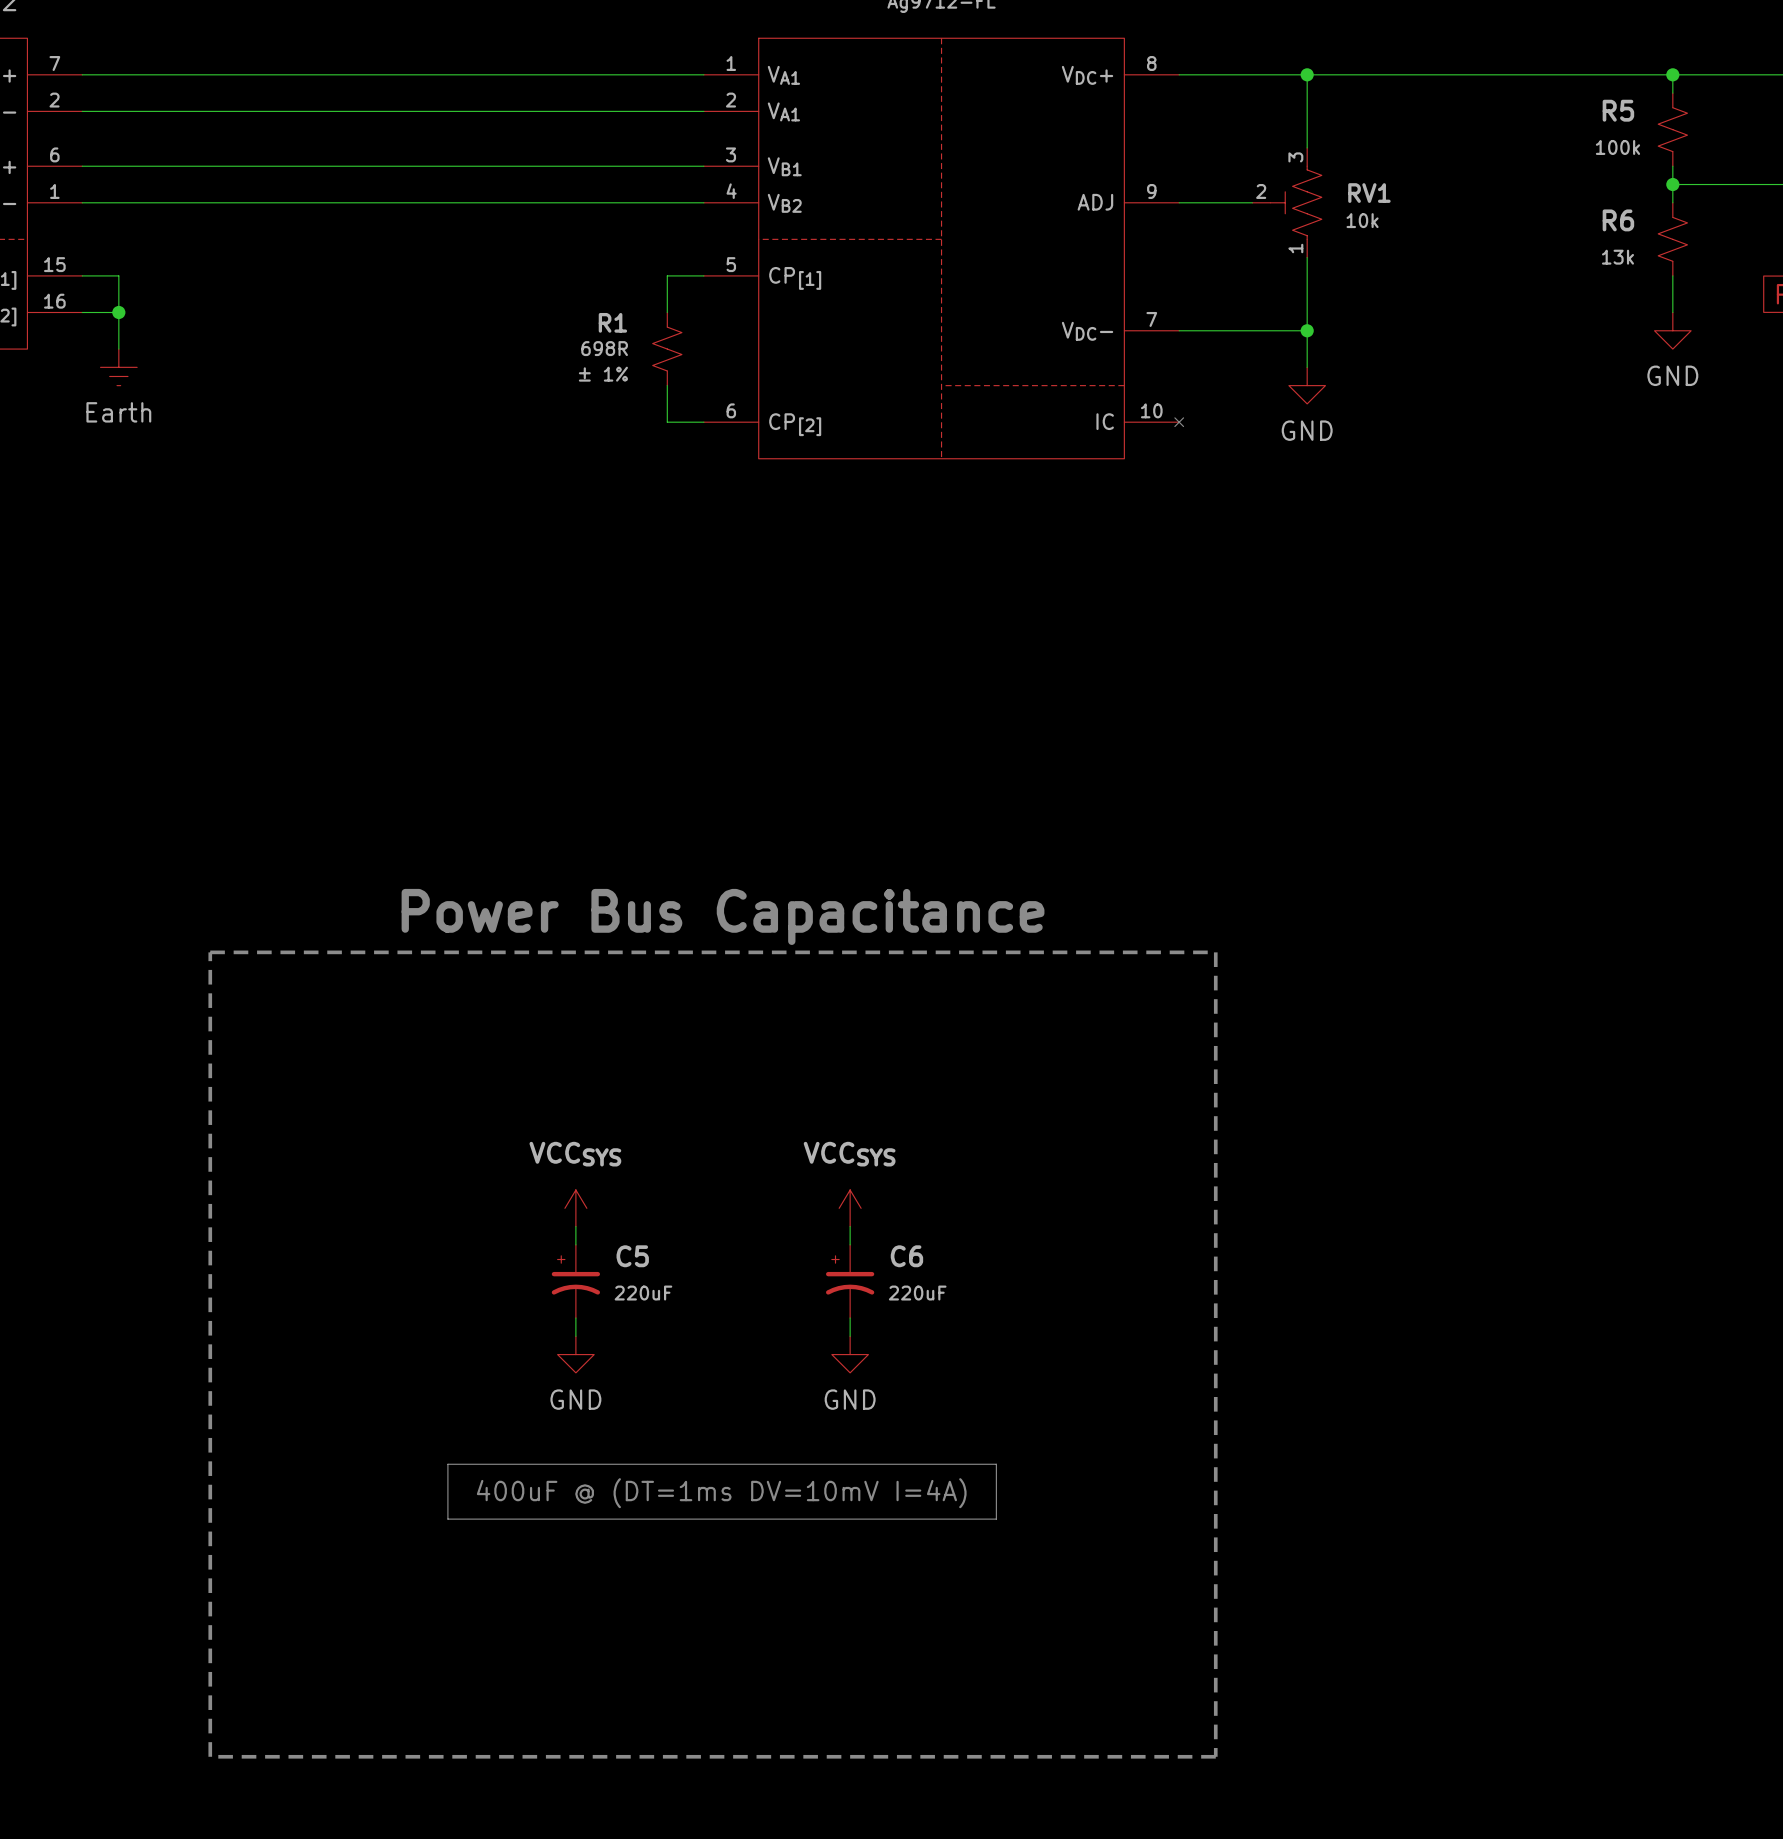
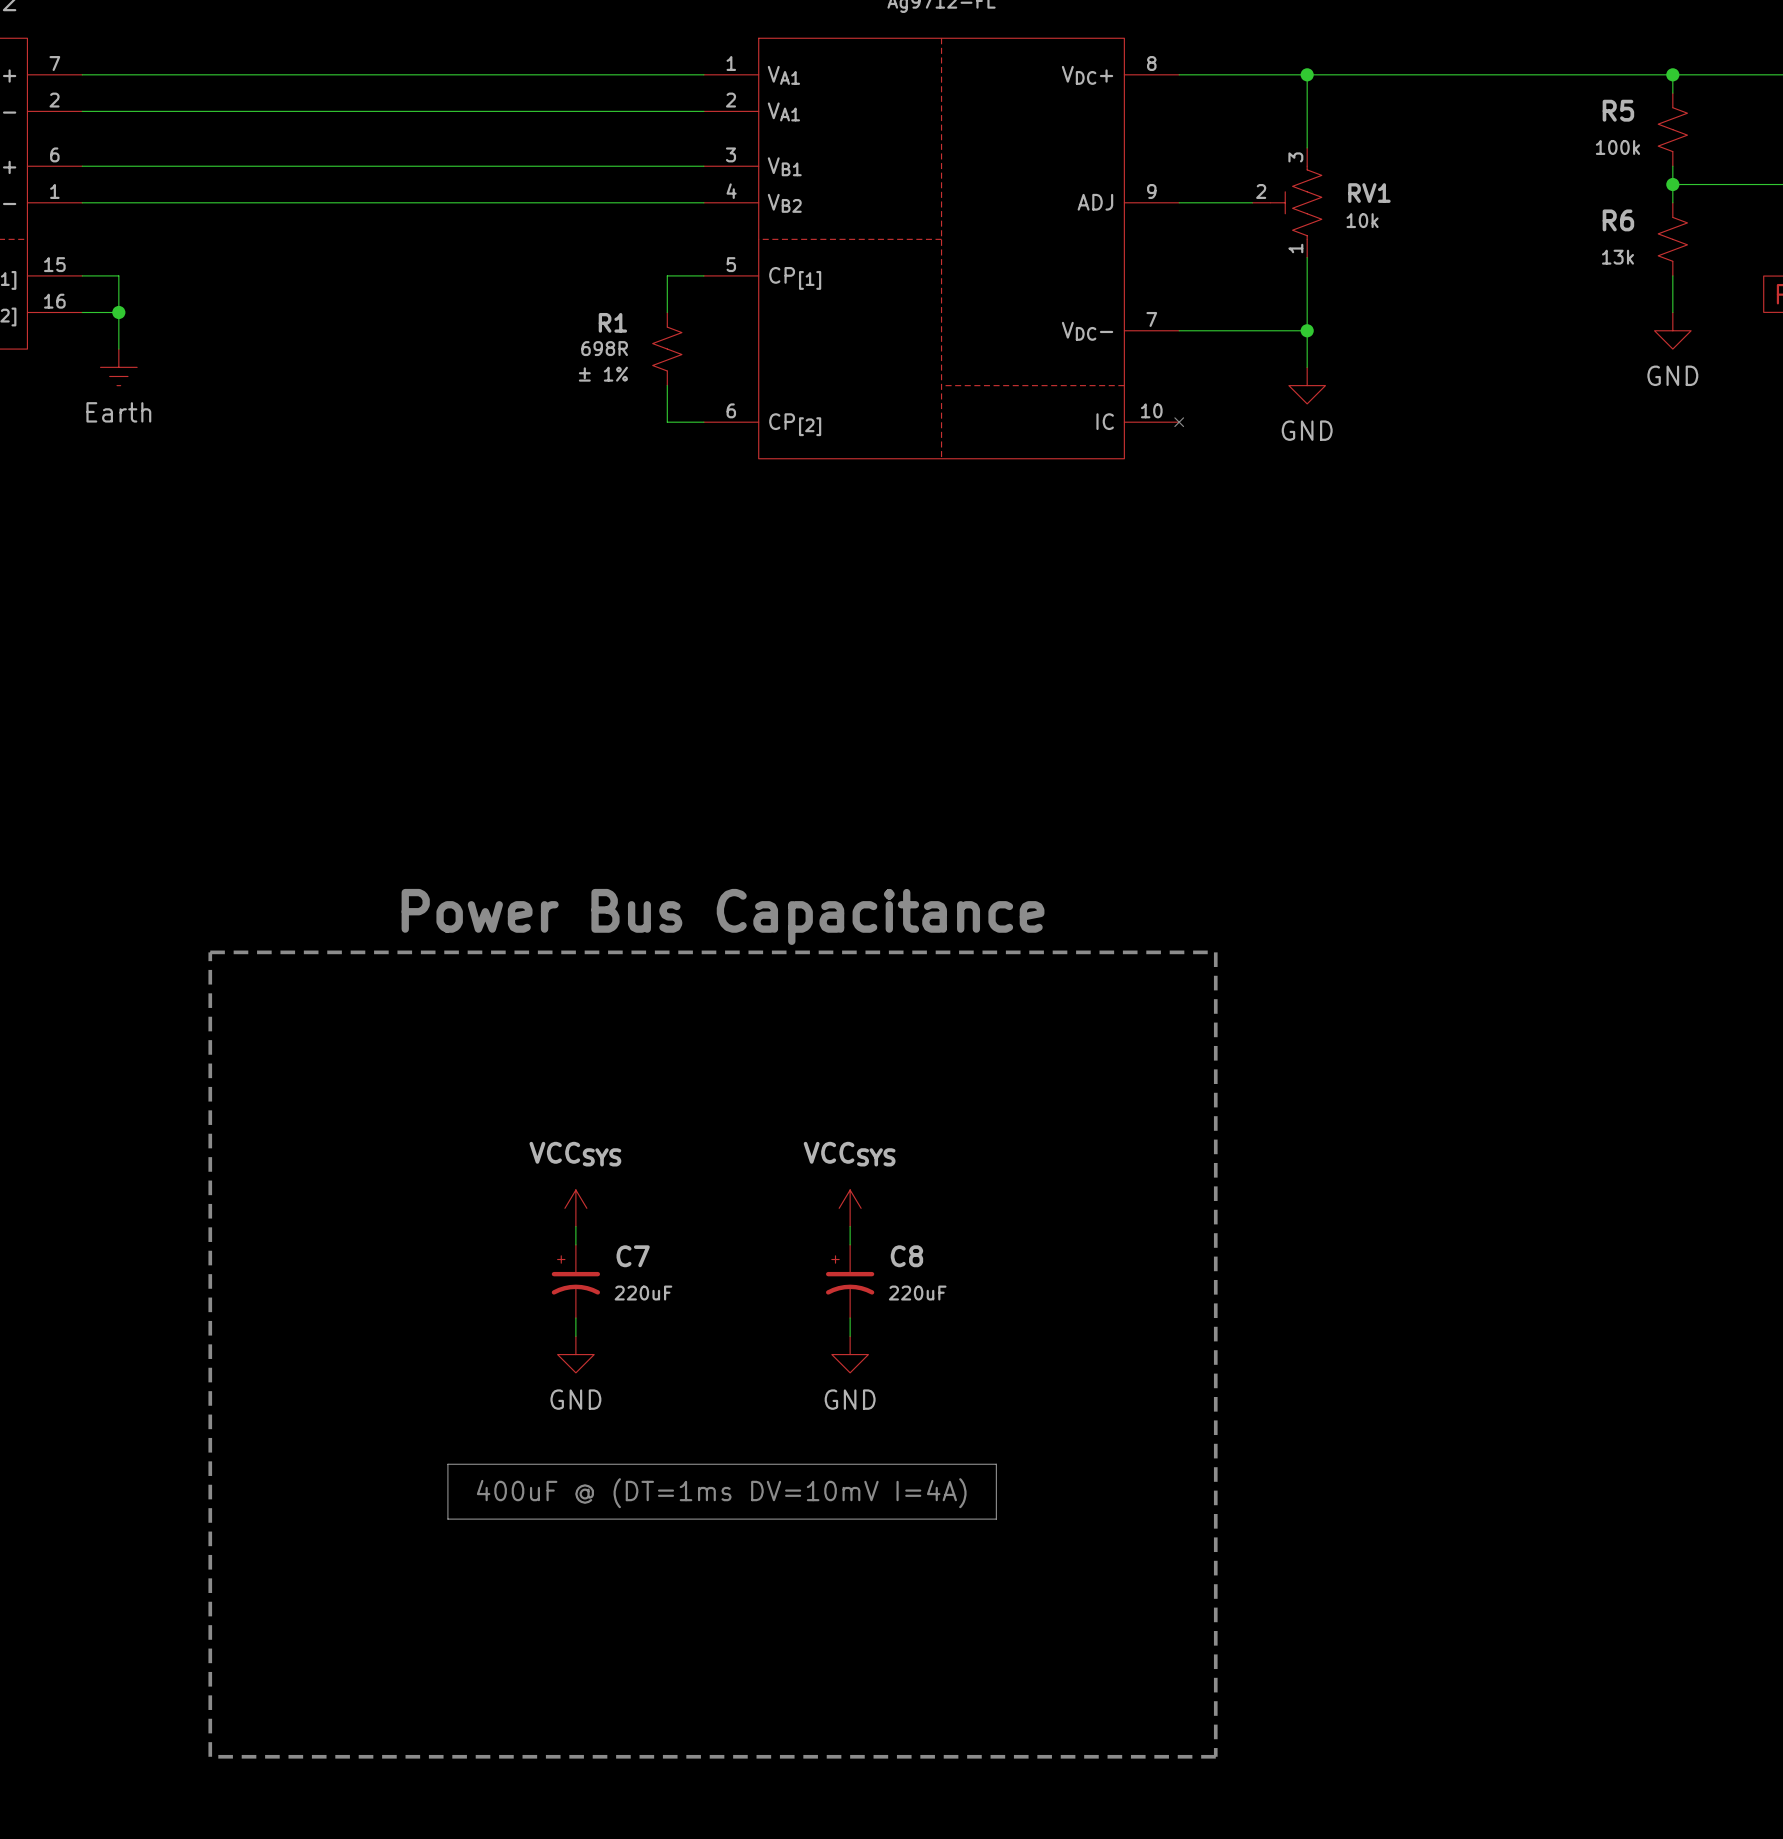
C5 name: C5 (632, 1256) -> C7 (633, 1256)
C6 name: C6 (906, 1256) -> C8 (906, 1256)

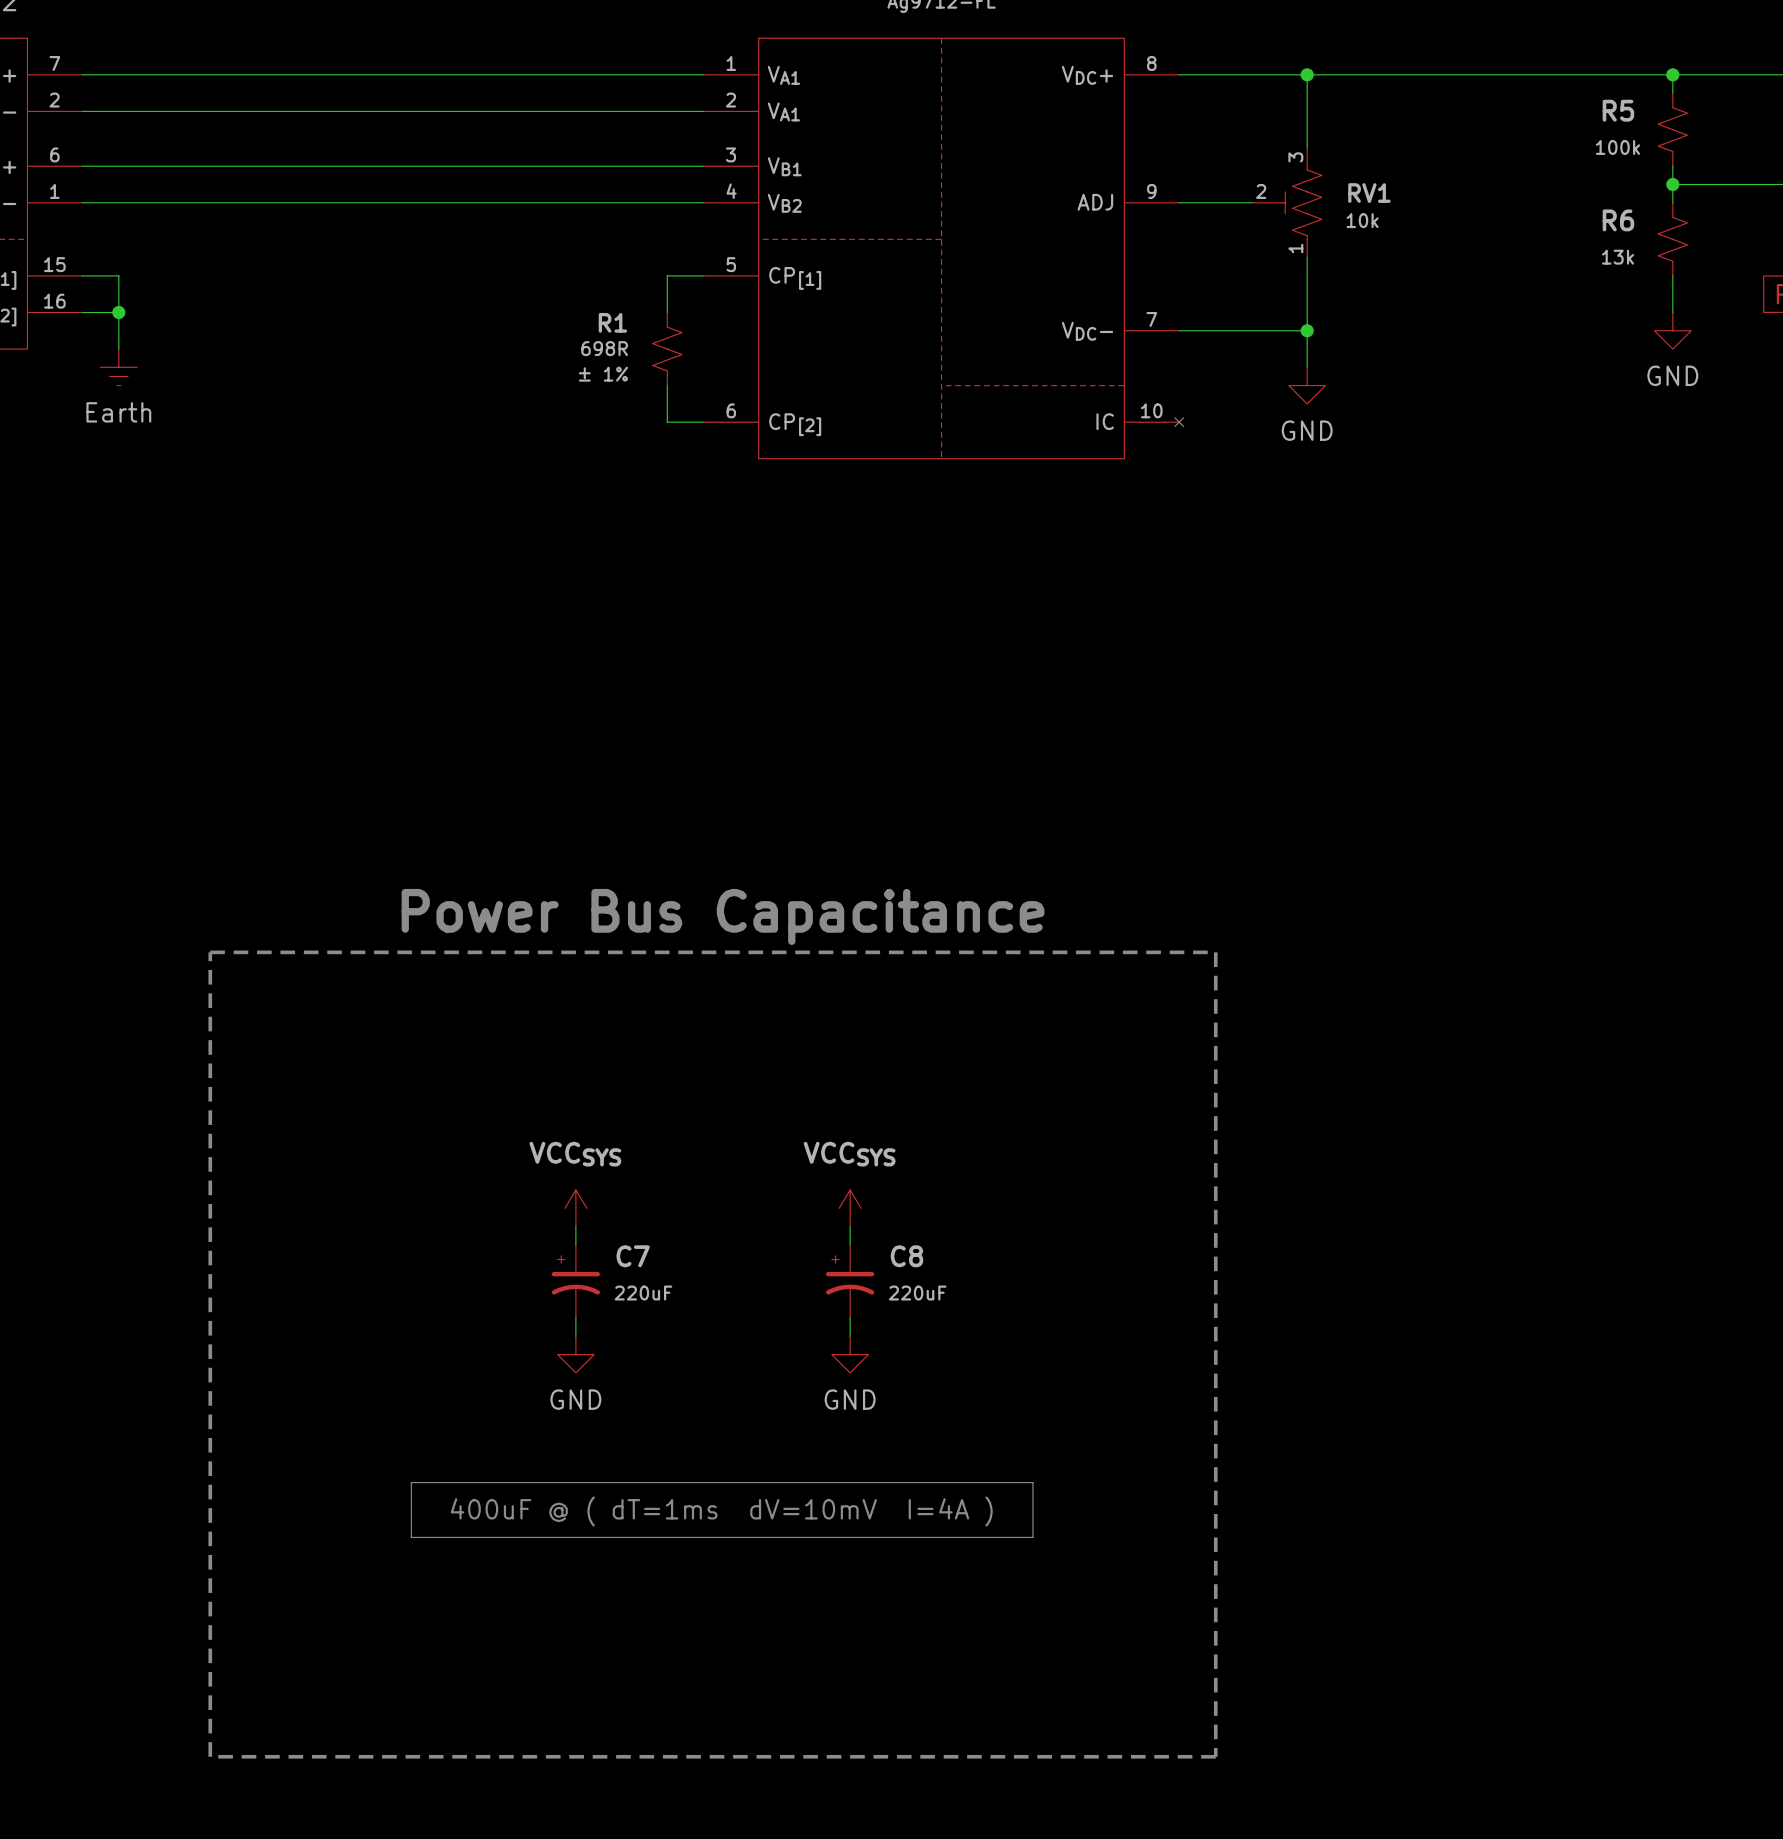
line: (447, 1464) (996, 1464) (996, 1519) (447, 1519) (447, 1464) -> none
line: none -> (411, 1482) (1032, 1482) (1032, 1537) (411, 1537) (411, 1482)
text: 400uF @ (DT=1ms DV=10mV I=4A) (721, 1493) -> 400uF @ ( dT=1ms dV=10mV I=4A ) (721, 1511)

